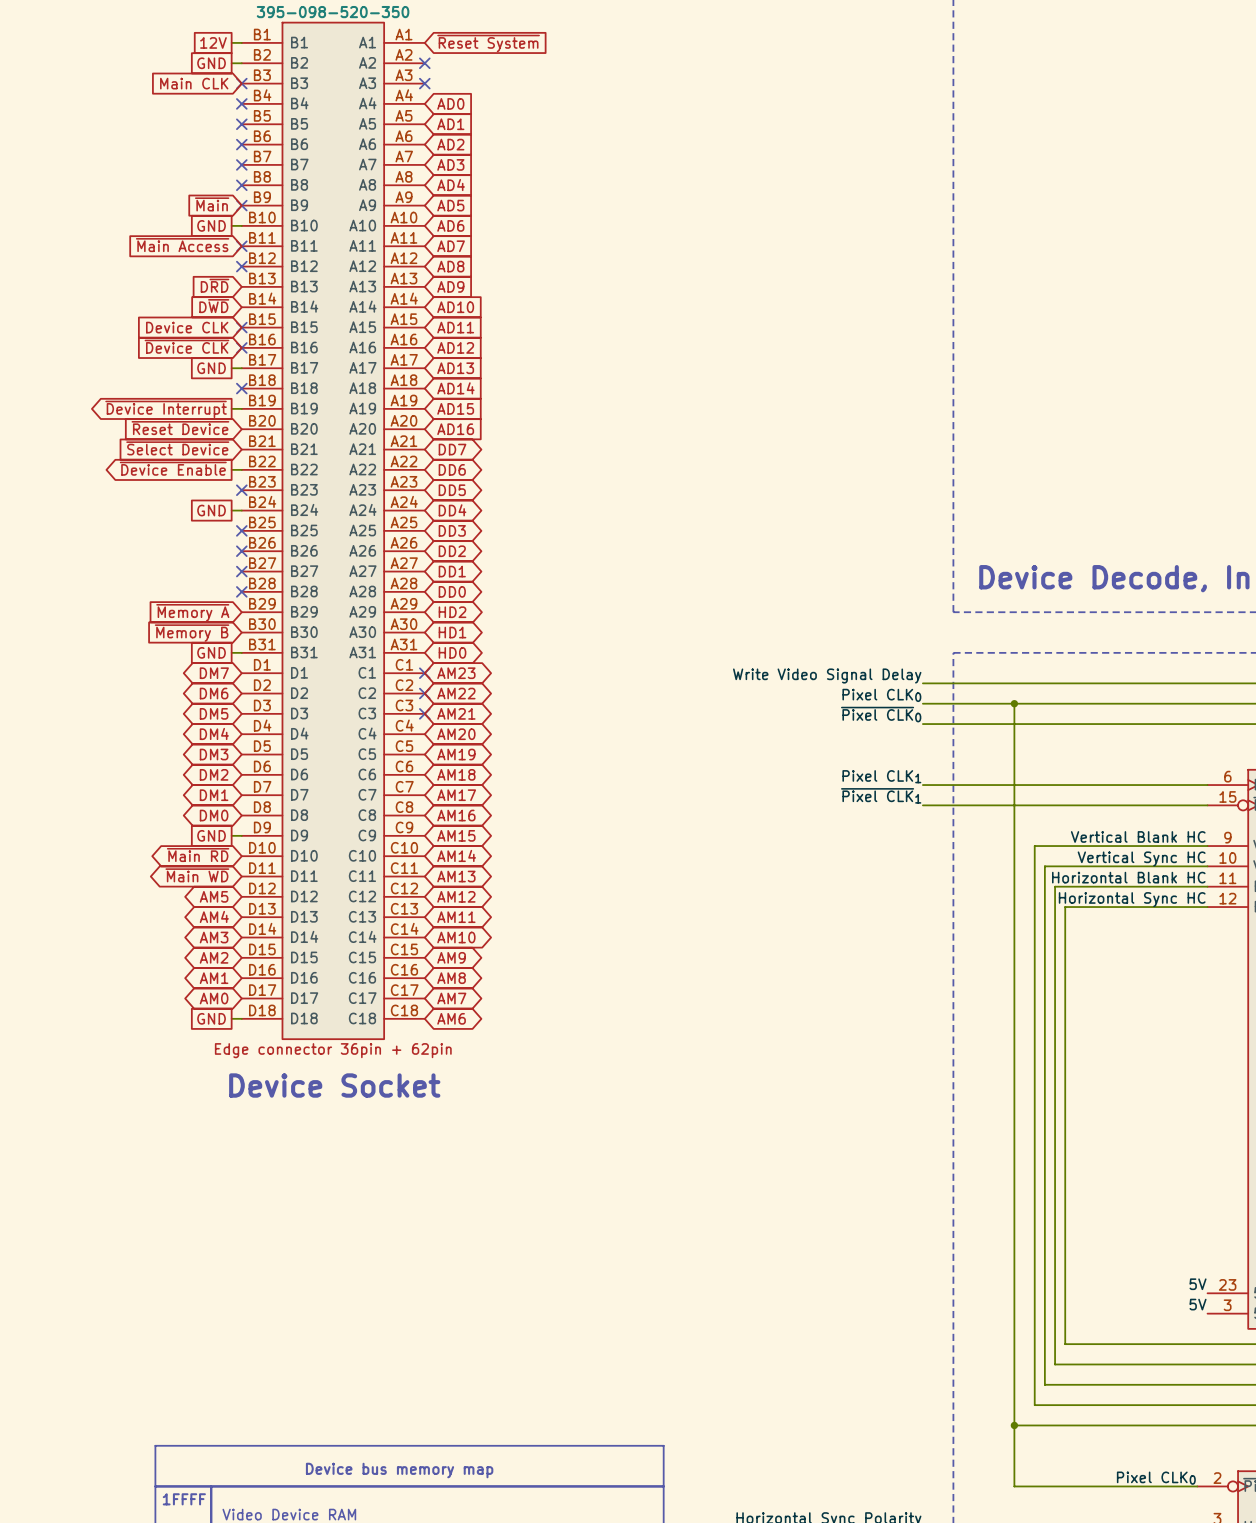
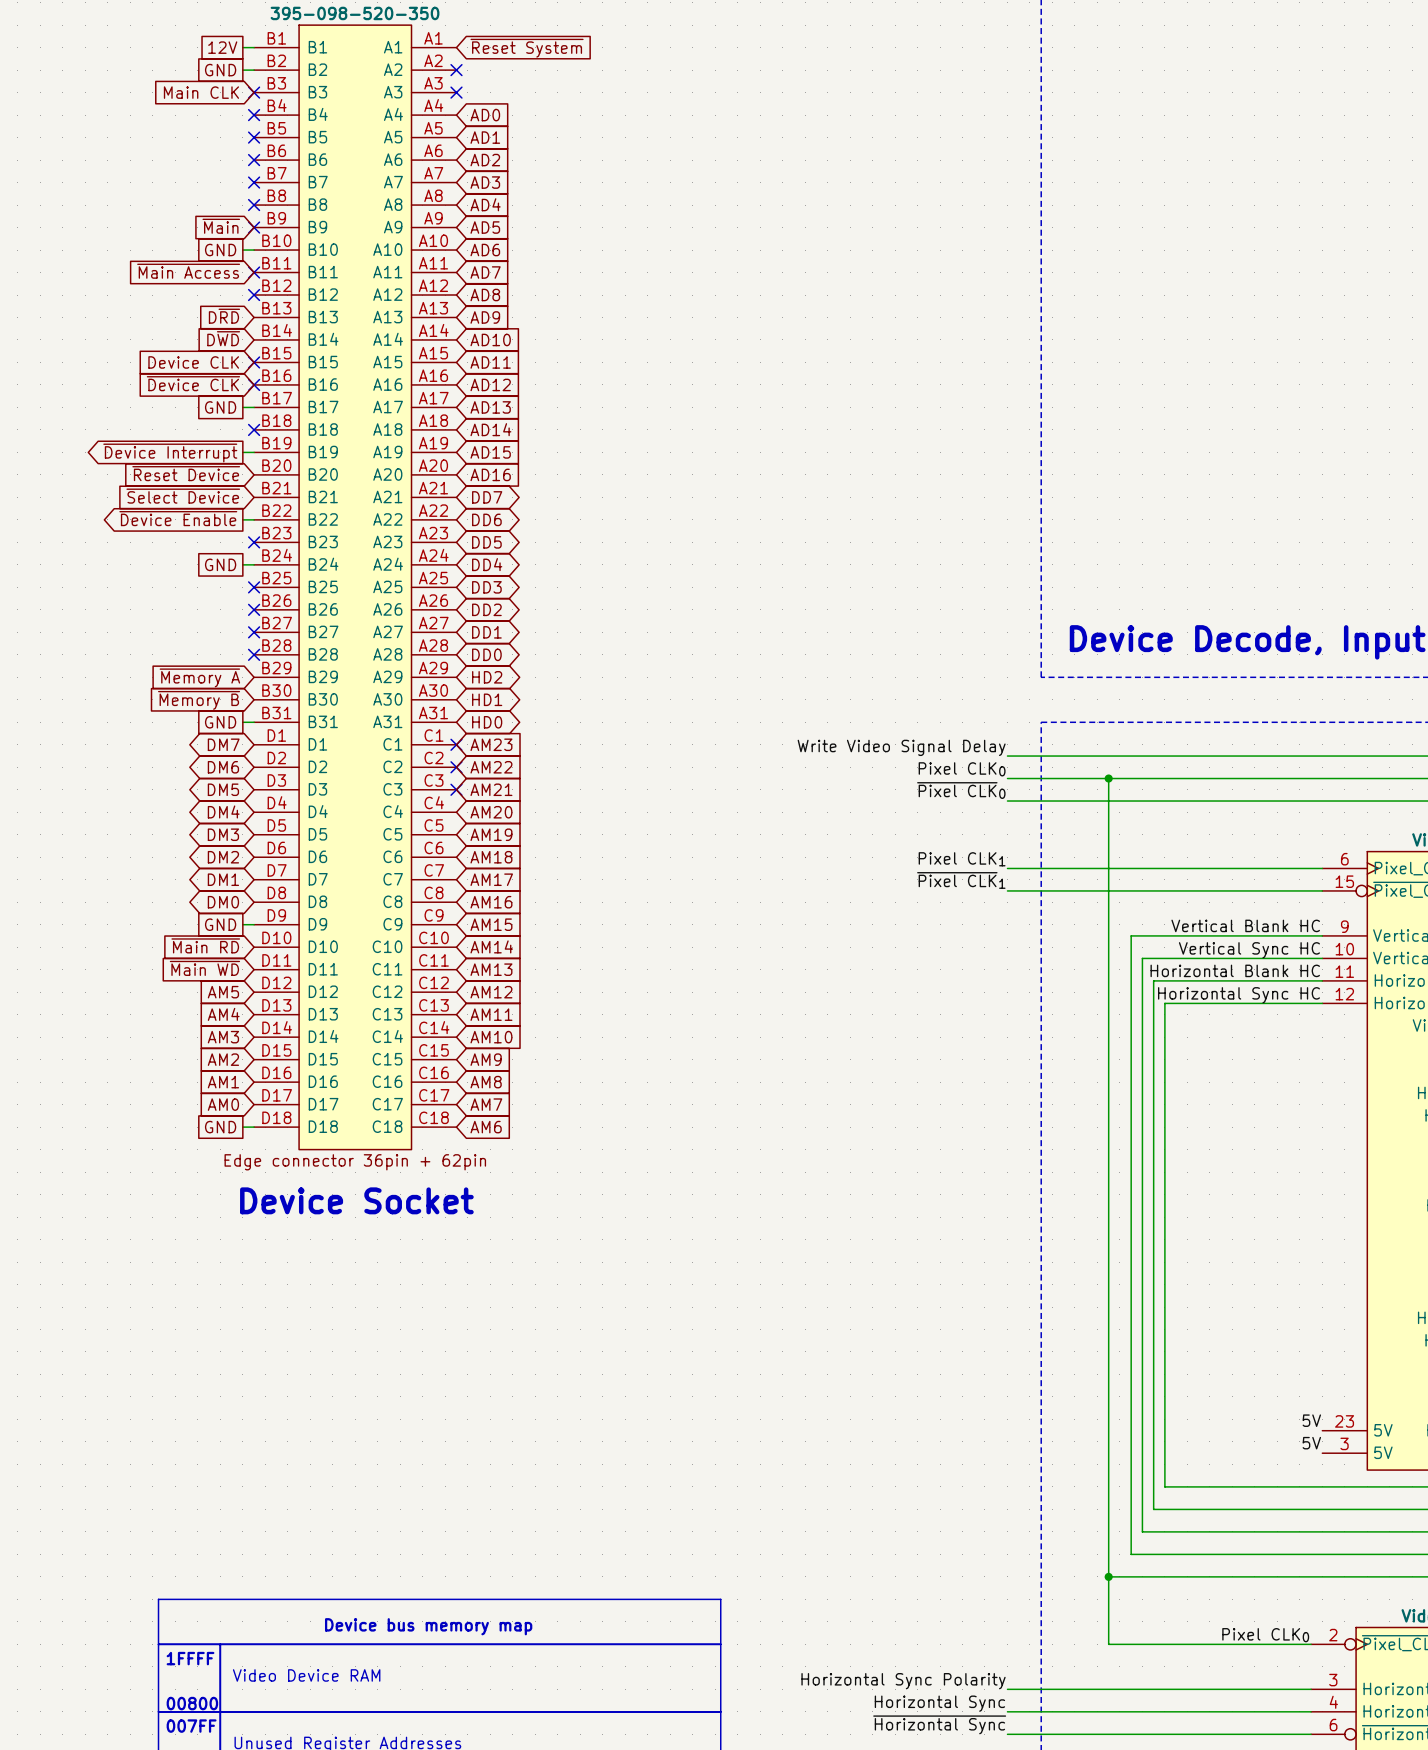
global label shape: bidirectional (456, 673) -> input (491, 744)
global label shape: bidirectional (456, 693) -> input (491, 767)
global label shape: bidirectional (456, 713) -> input (491, 789)
global label shape: bidirectional (456, 734) -> input (491, 812)
global label shape: bidirectional (456, 754) -> input (491, 834)
global label shape: bidirectional (456, 774) -> input (491, 857)
global label shape: bidirectional (456, 795) -> input (491, 879)
global label shape: bidirectional (456, 815) -> input (491, 902)
global label shape: bidirectional (456, 835) -> input (491, 924)
global label shape: bidirectional (198, 855) -> input (205, 945)
global label shape: bidirectional (456, 855) -> input (491, 946)
global label shape: bidirectional (197, 875) -> input (204, 968)
global label shape: bidirectional (456, 876) -> input (491, 969)
global label shape: bidirectional (214, 896) -> input (223, 992)
global label shape: bidirectional (456, 896) -> input (491, 992)
global label shape: bidirectional (214, 916) -> input (223, 1014)
global label shape: bidirectional (456, 917) -> input (491, 1014)
global label shape: bidirectional (214, 937) -> input (223, 1037)
global label shape: bidirectional (456, 937) -> input (491, 1037)
global label shape: bidirectional (214, 957) -> input (223, 1059)
global label shape: bidirectional (451, 957) -> input (486, 1059)
global label shape: bidirectional (214, 978) -> input (223, 1082)
global label shape: bidirectional (451, 978) -> input (486, 1082)
global label shape: bidirectional (214, 998) -> input (223, 1104)
global label shape: bidirectional (451, 998) -> input (486, 1104)
global label shape: bidirectional (451, 1018) -> input (486, 1127)

